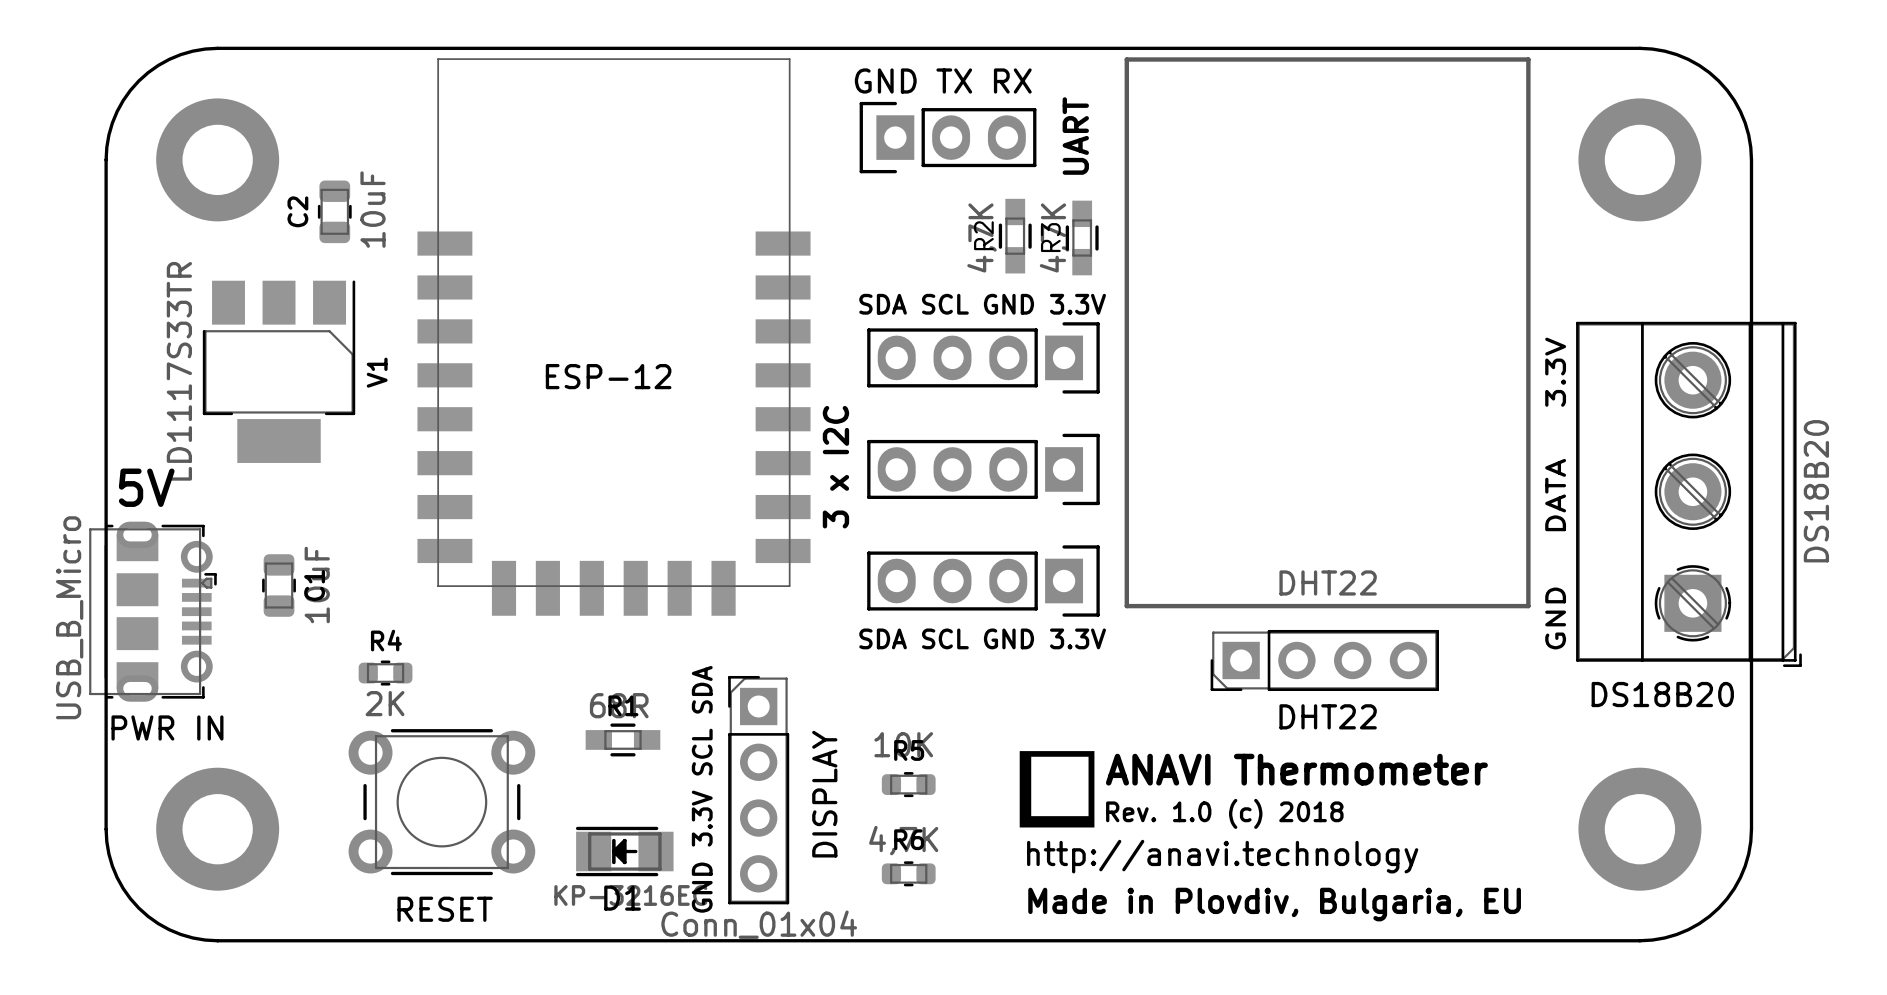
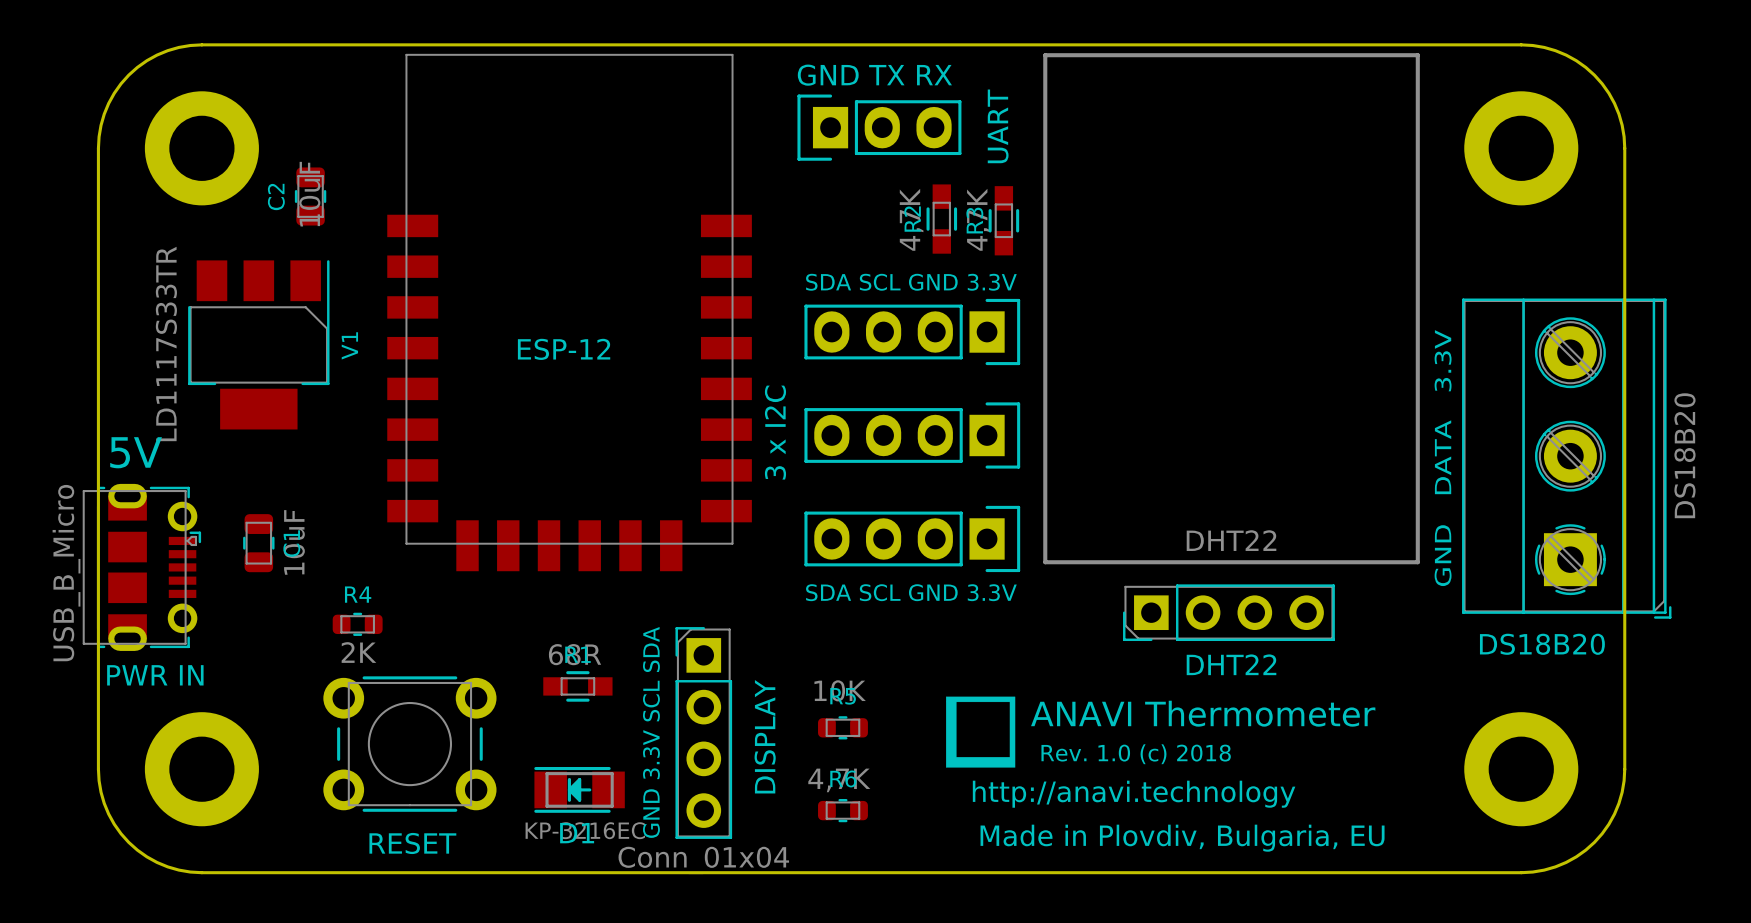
C2 value position: 10uF (373, 209) -> 10uF (309, 194)

